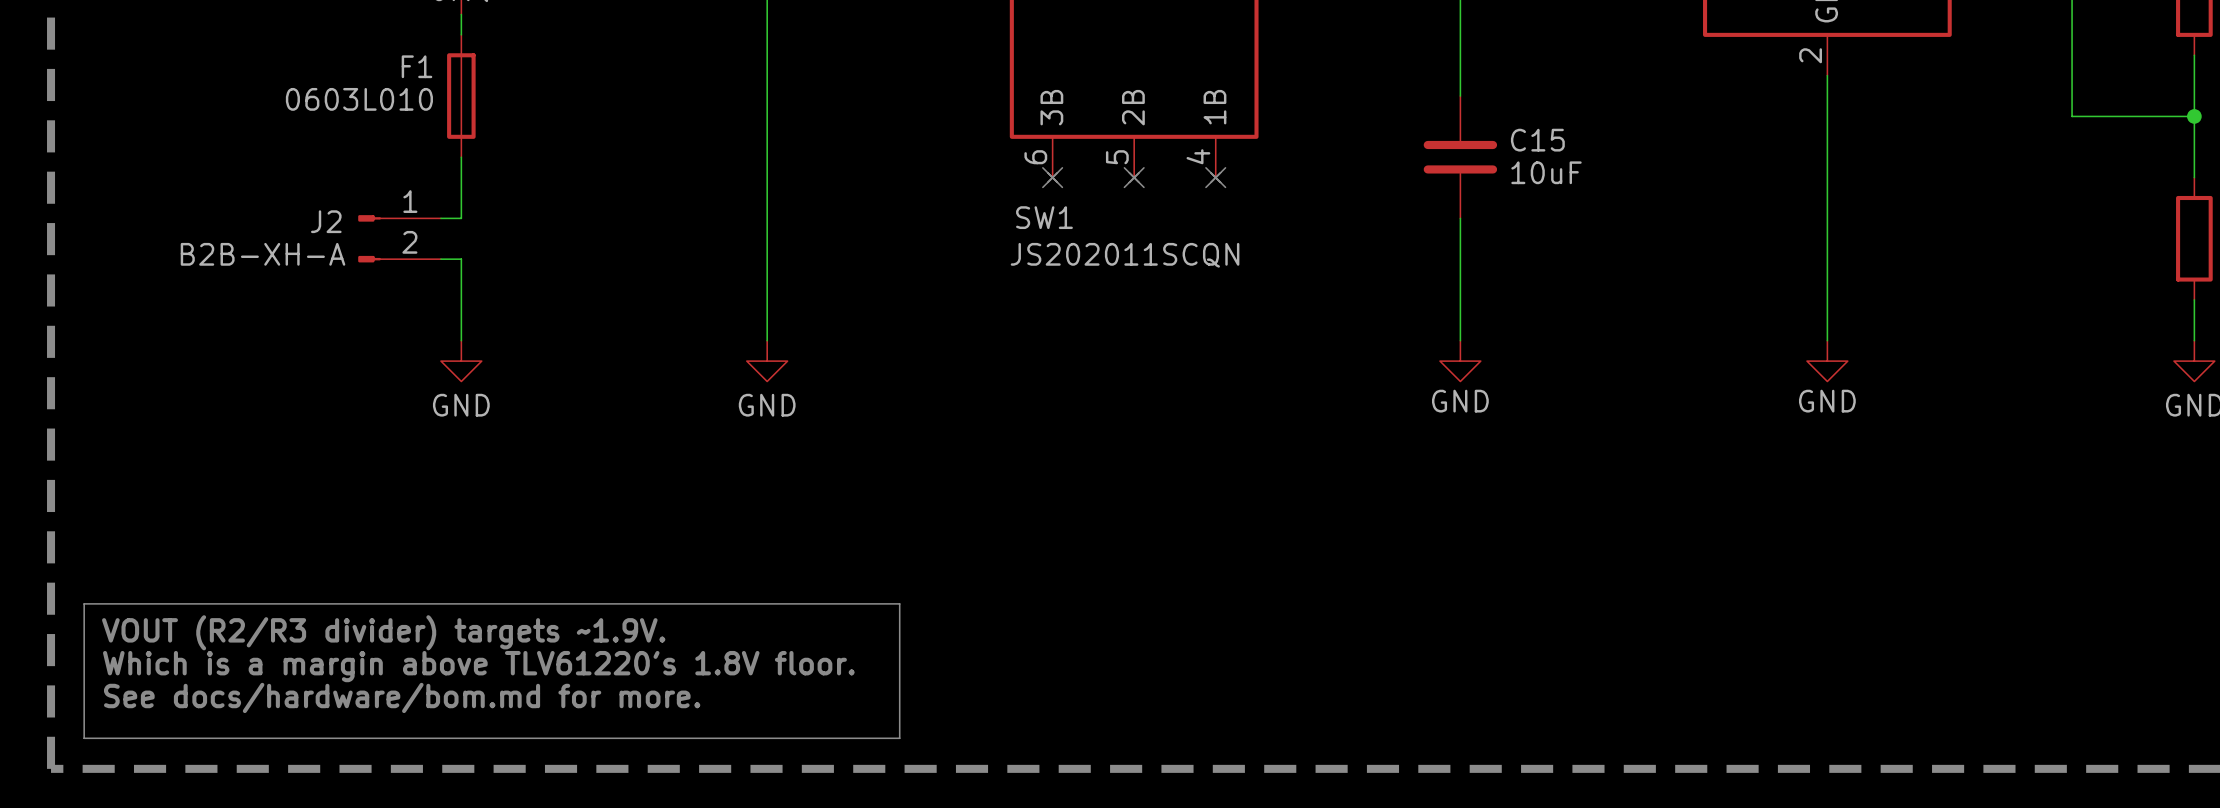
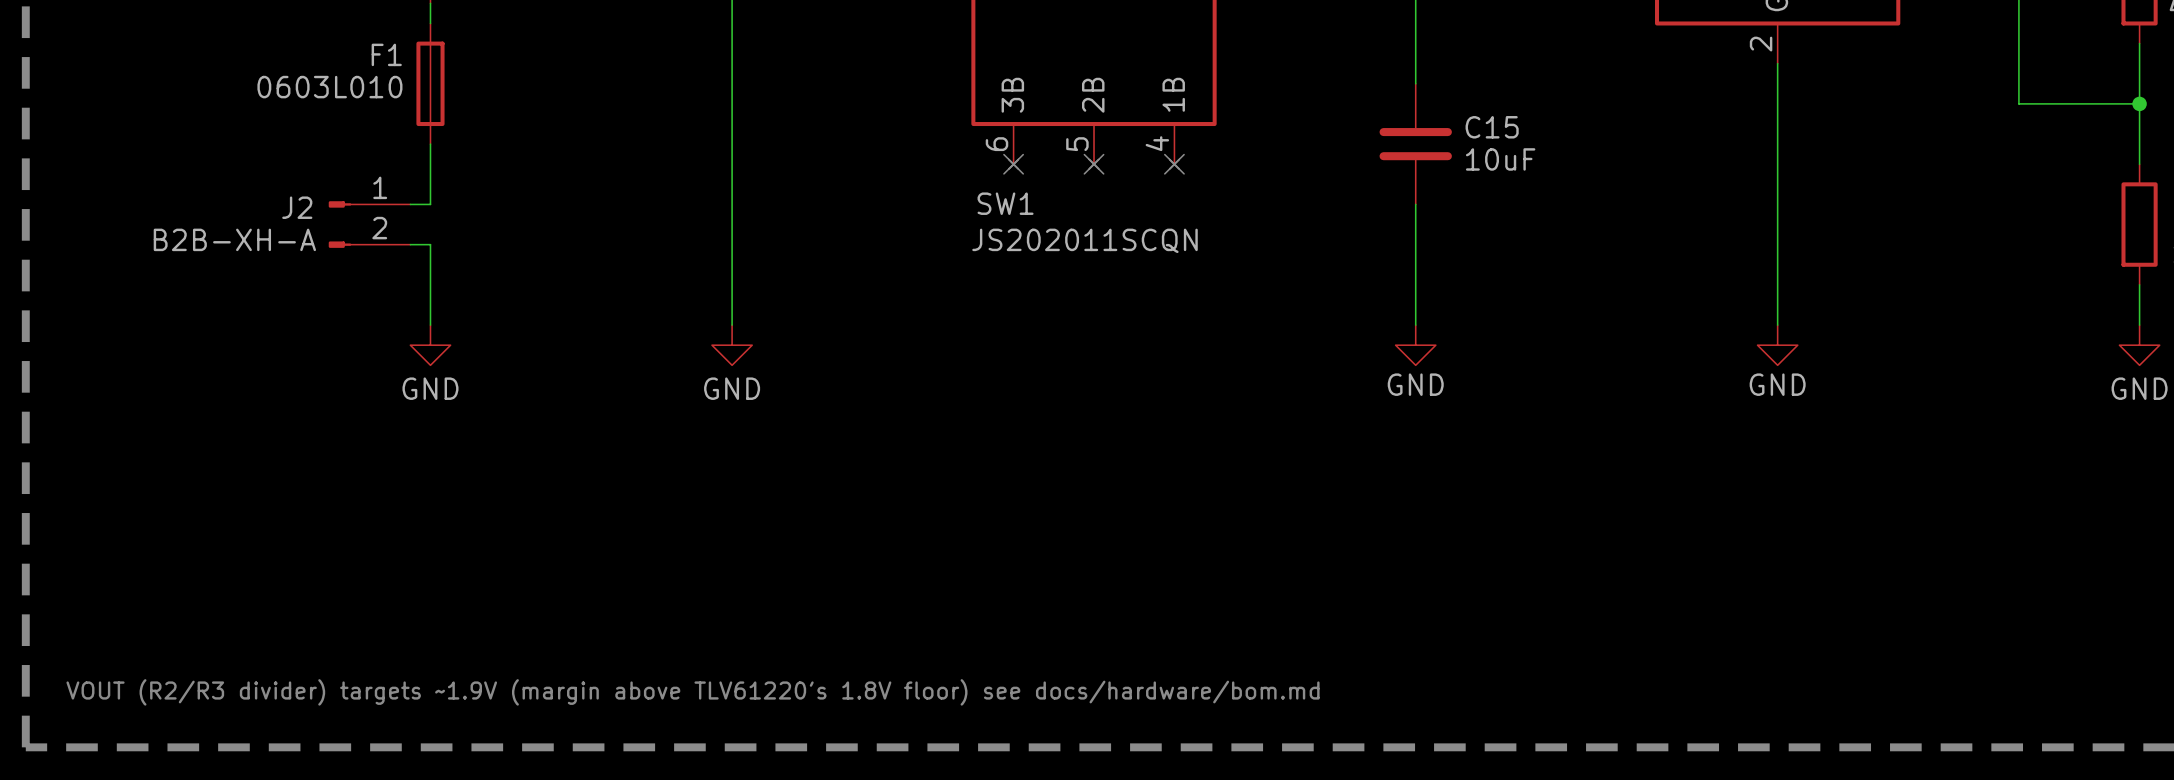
line: (84, 603) (899, 603) (899, 738) (84, 738) (84, 603) -> none
text: VOUT (R2/R3 divider) targets ~1.9V. (383, 632) -> none
text: Which is a margin above TLV61220's 1.8V floor. (478, 666) -> none
text: See docs/hardware/bom.md for more. (402, 697) -> none
text: none -> VOUT (R2/R3 divider) targets ~1.9V (margin above TLV61220's 1.8V floor) see docs/hardware/bom.md (693, 692)

